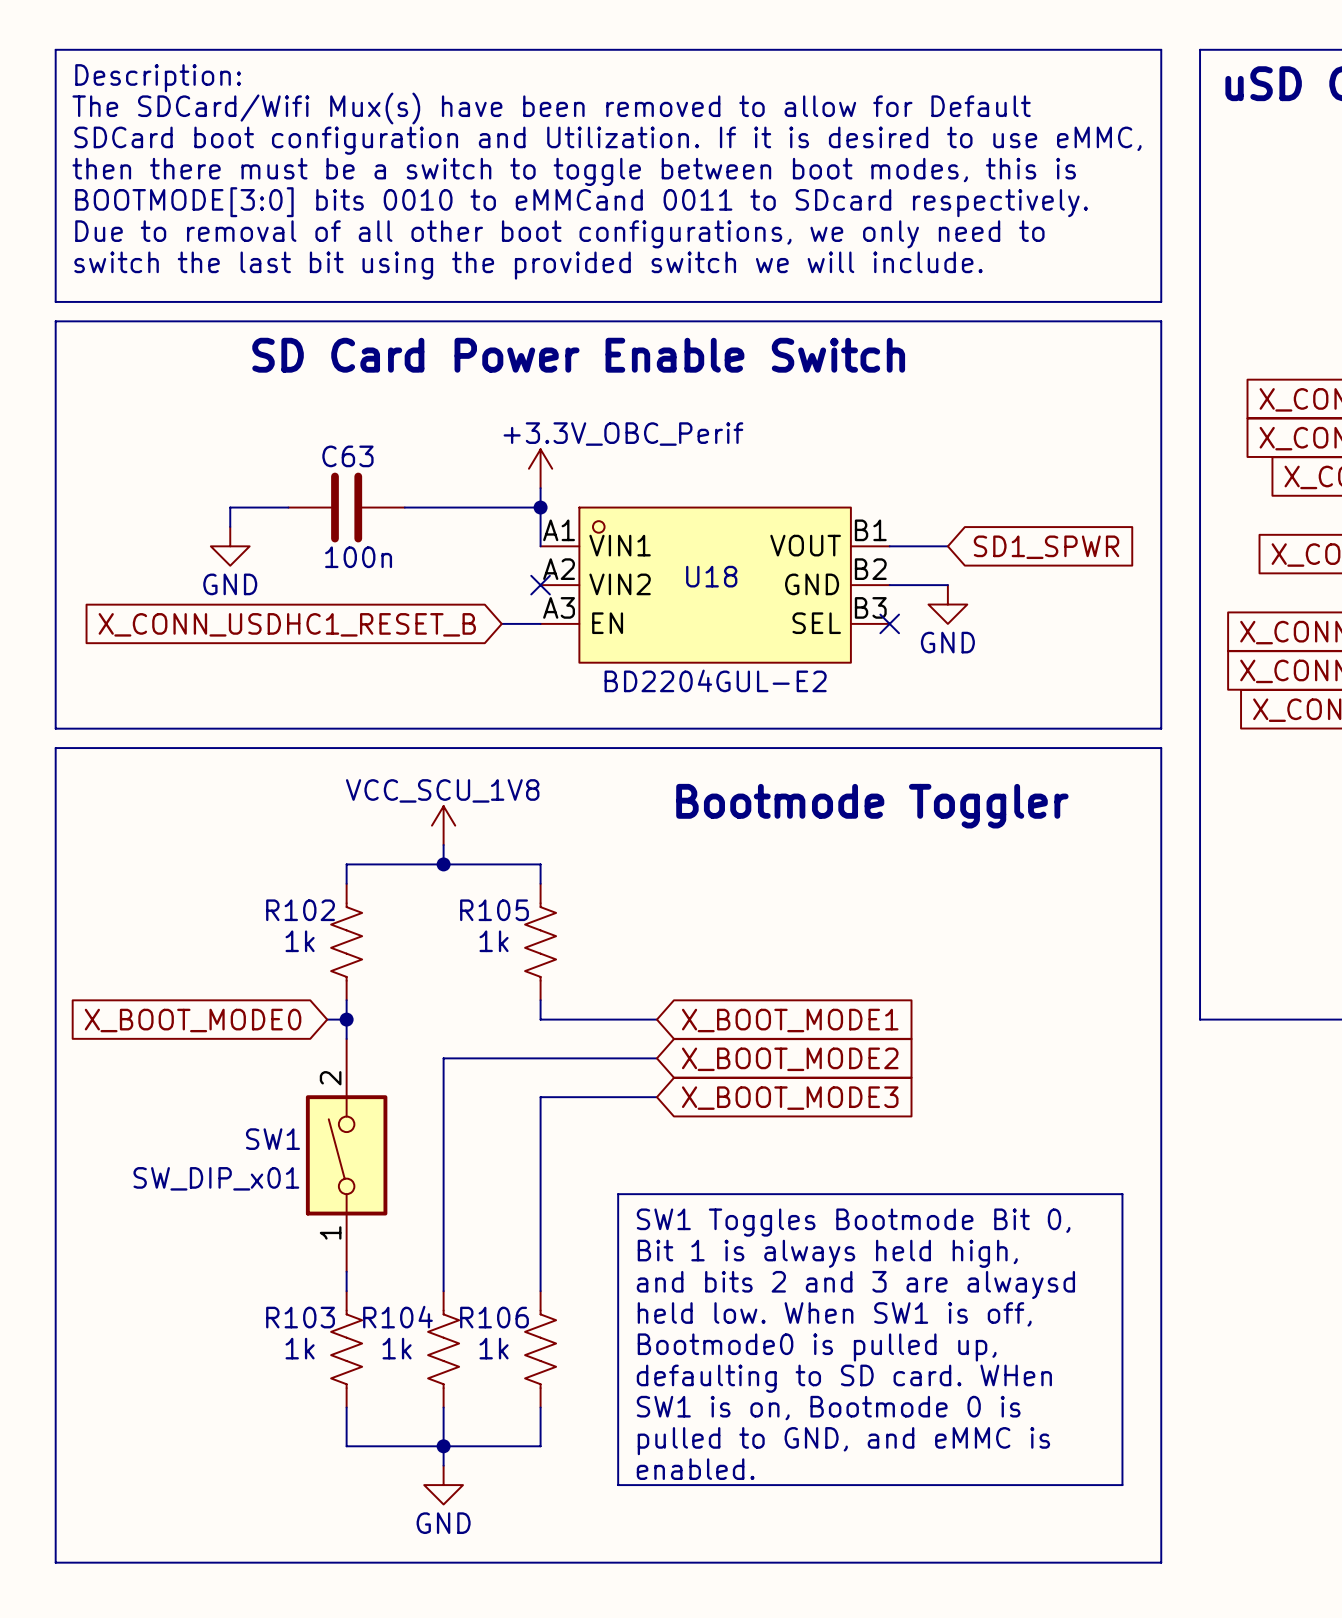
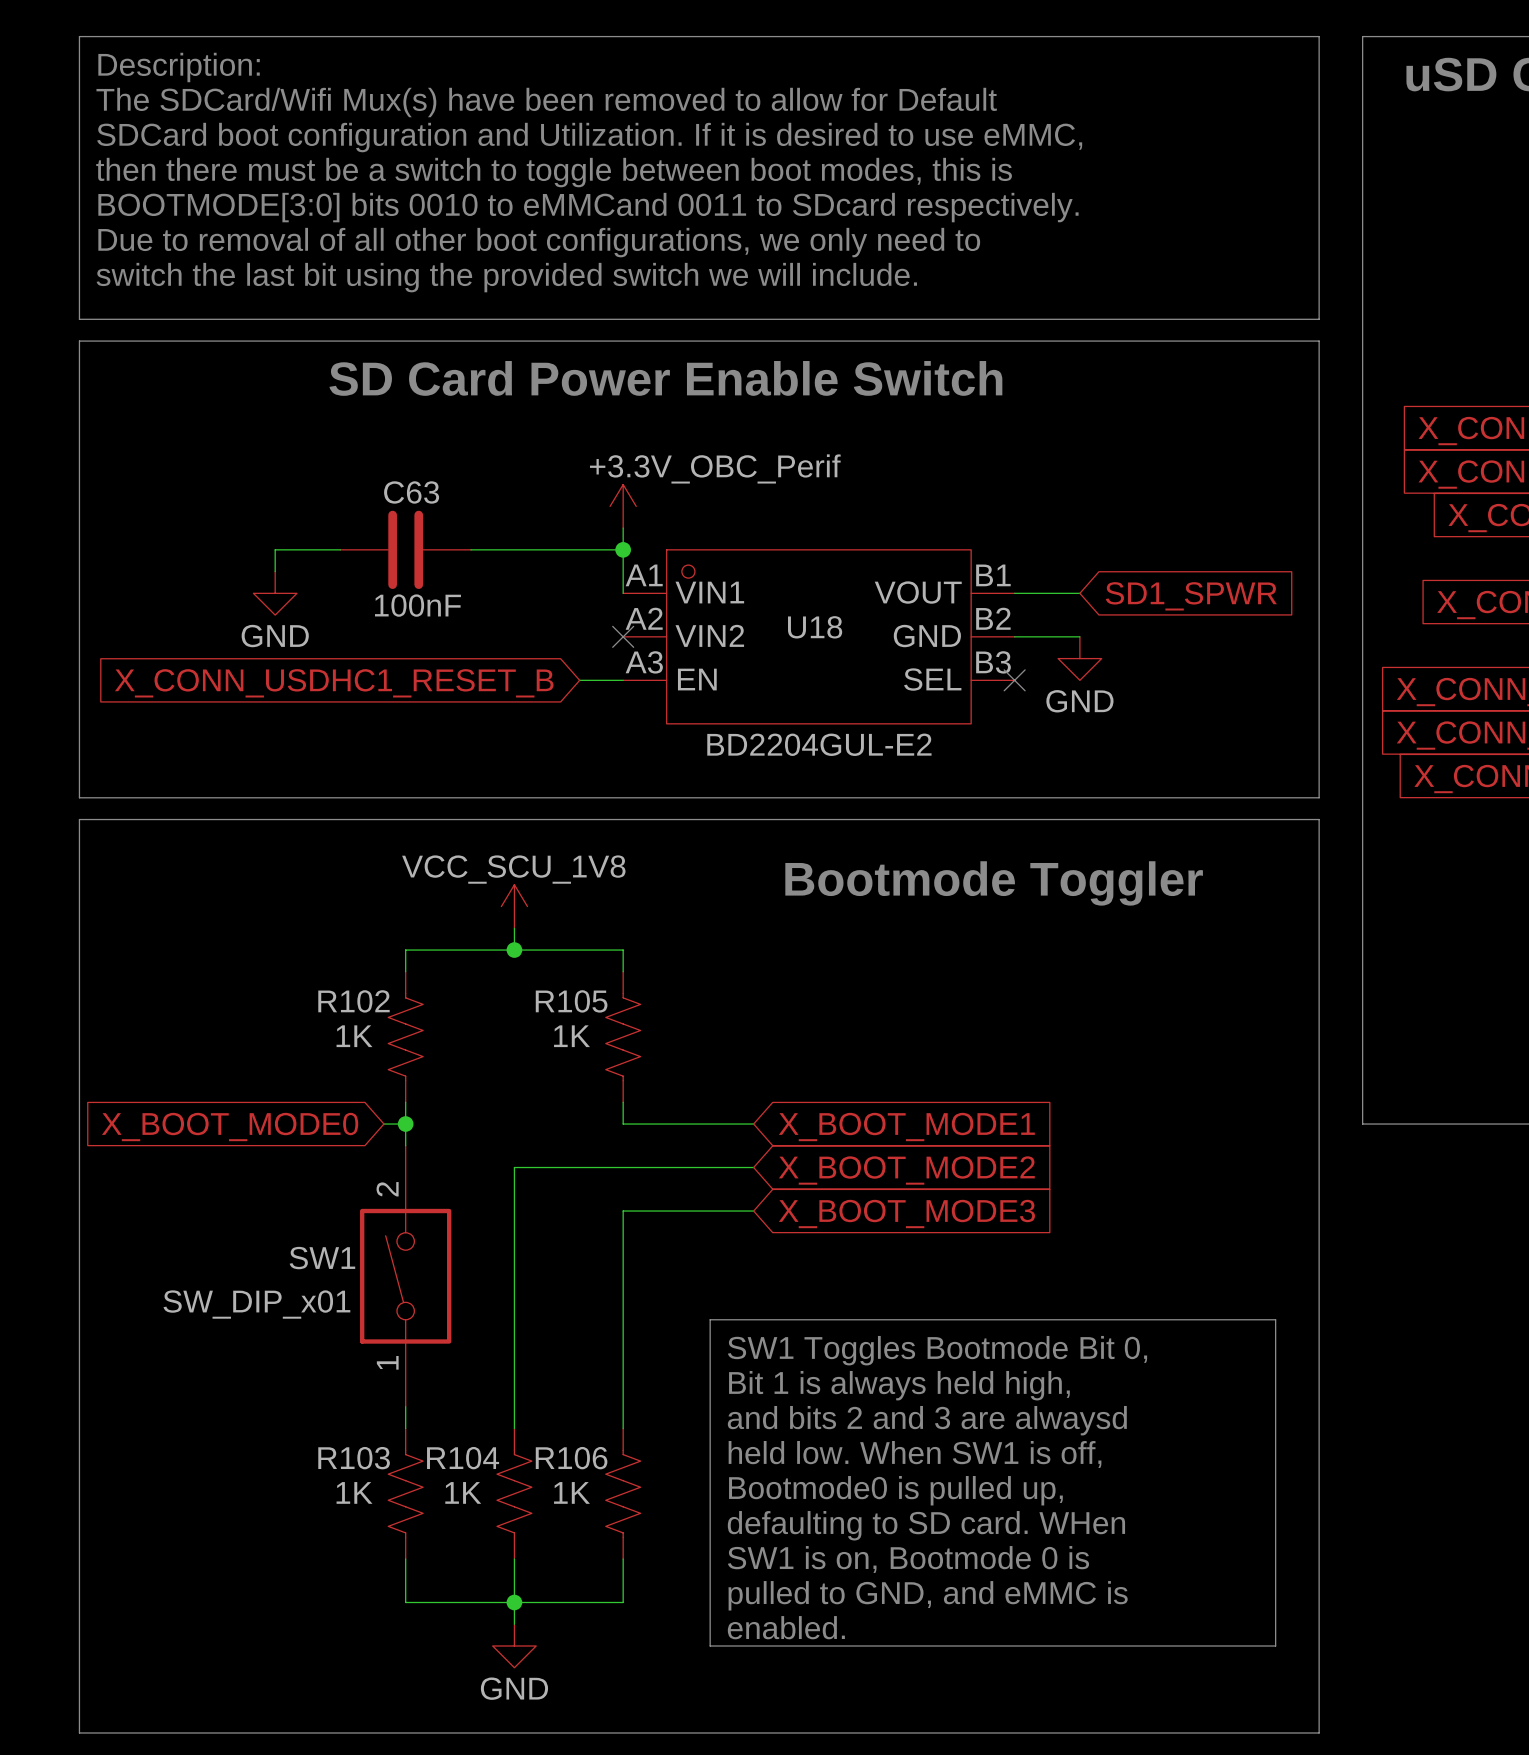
C63 value: 100n (358, 557) -> 100nF (417, 605)
R102 value: 1k (300, 941) -> 1K (354, 1036)
R105 value: 1k (494, 941) -> 1K (572, 1036)
R103 value: 1k (300, 1348) -> 1K (354, 1492)
R104 value: 1k (397, 1348) -> 1K (463, 1492)
R106 value: 1k (494, 1348) -> 1K (572, 1492)

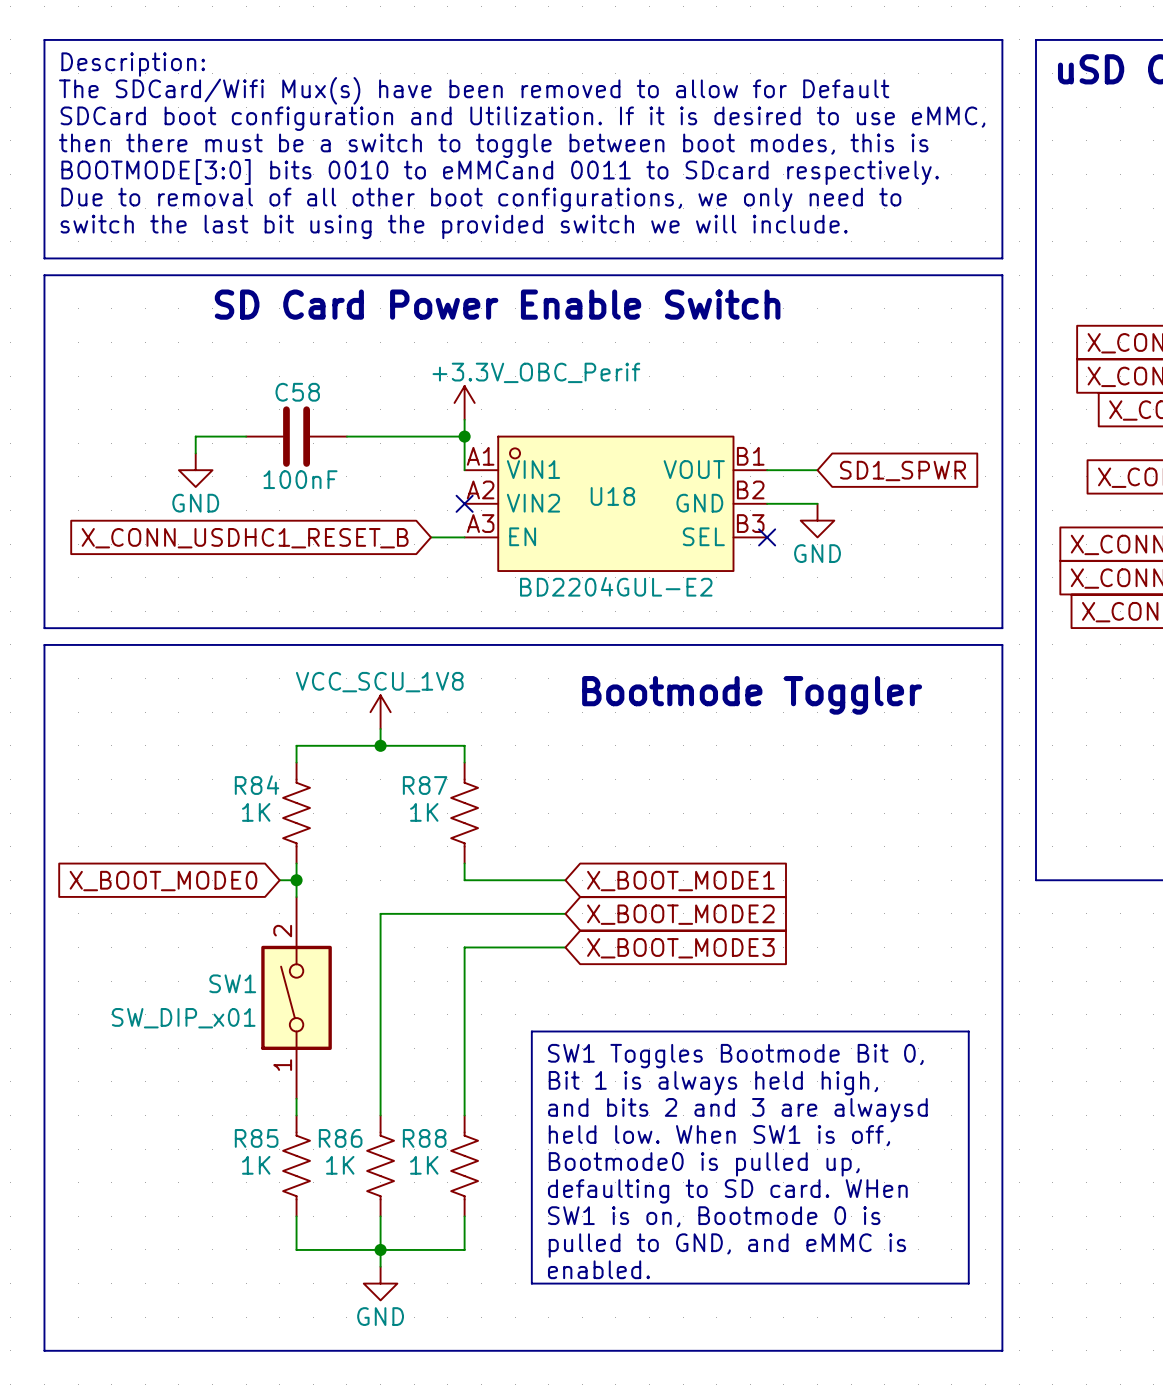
C63 name: C63 (411, 492) -> C58 (297, 392)
R102 name: R102 (353, 1001) -> R84 (257, 785)
R105 name: R105 (571, 1001) -> R87 (425, 785)
R103 name: R103 (354, 1458) -> R85 (256, 1138)
R104 name: R104 (463, 1458) -> R86 (340, 1138)
R106 name: R106 (571, 1458) -> R88 (424, 1138)

